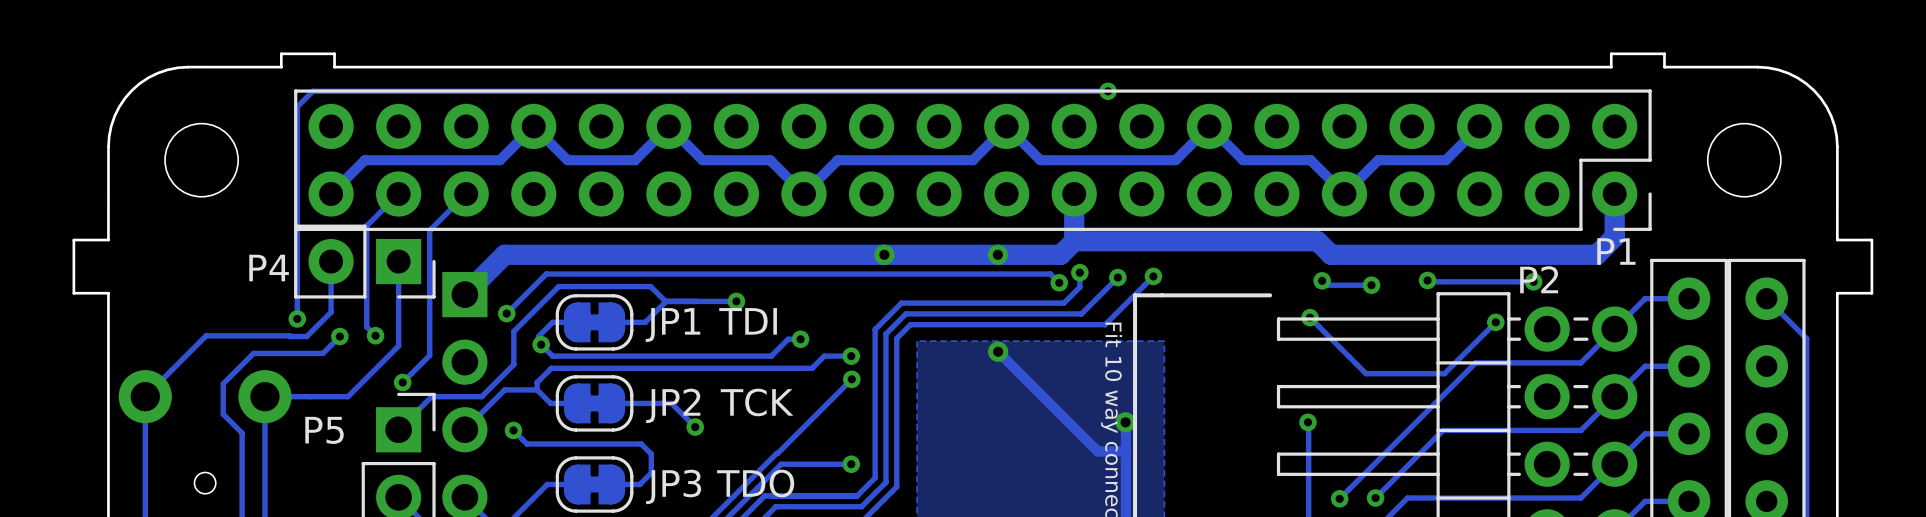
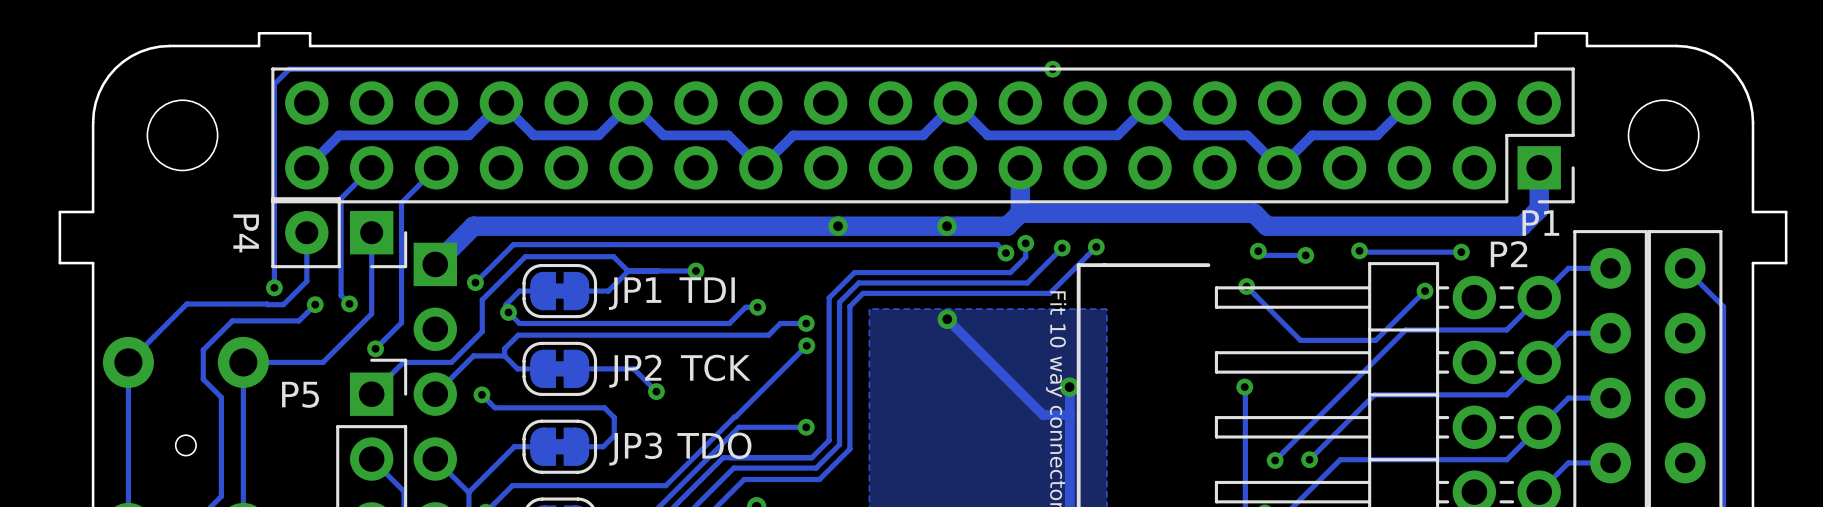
P1 footprint: [294, 89, 1652, 231] -> [271, 67, 1575, 204]
P4 name rotation: 0° (269, 268) -> 90° clockwise (246, 233)
P2 name position: P2 (1539, 279) -> P2 (1509, 254)

